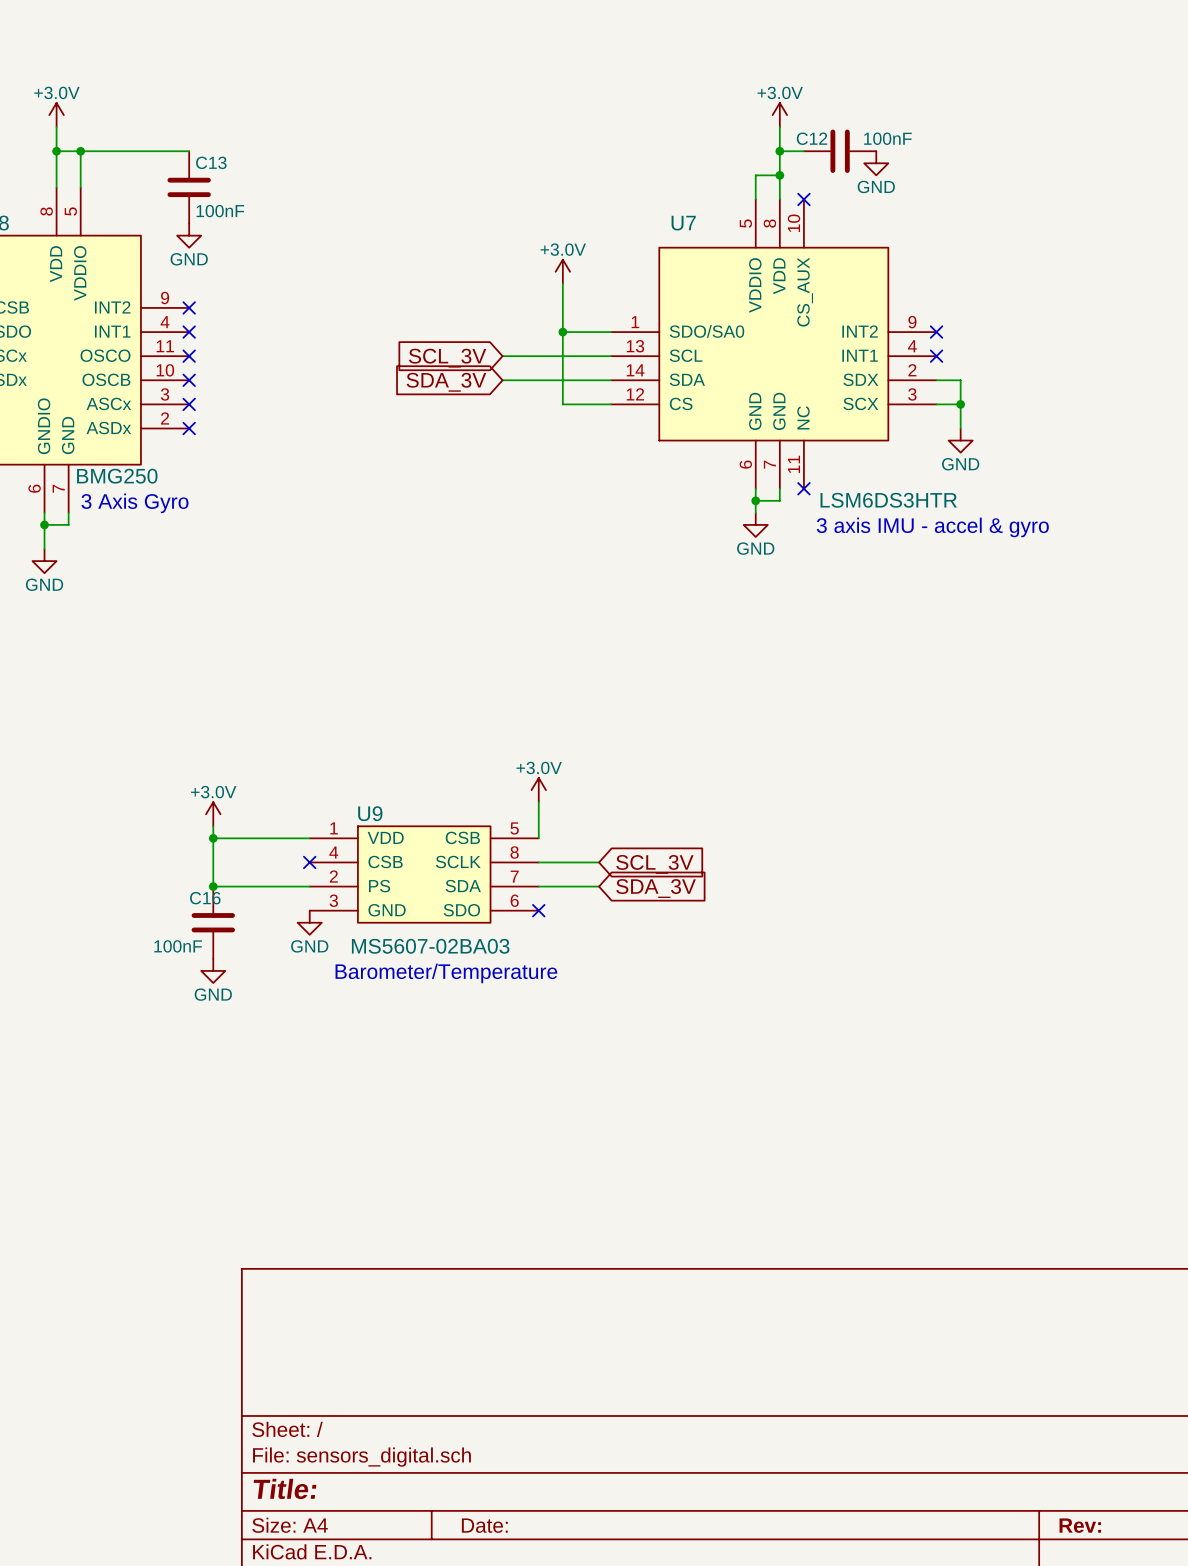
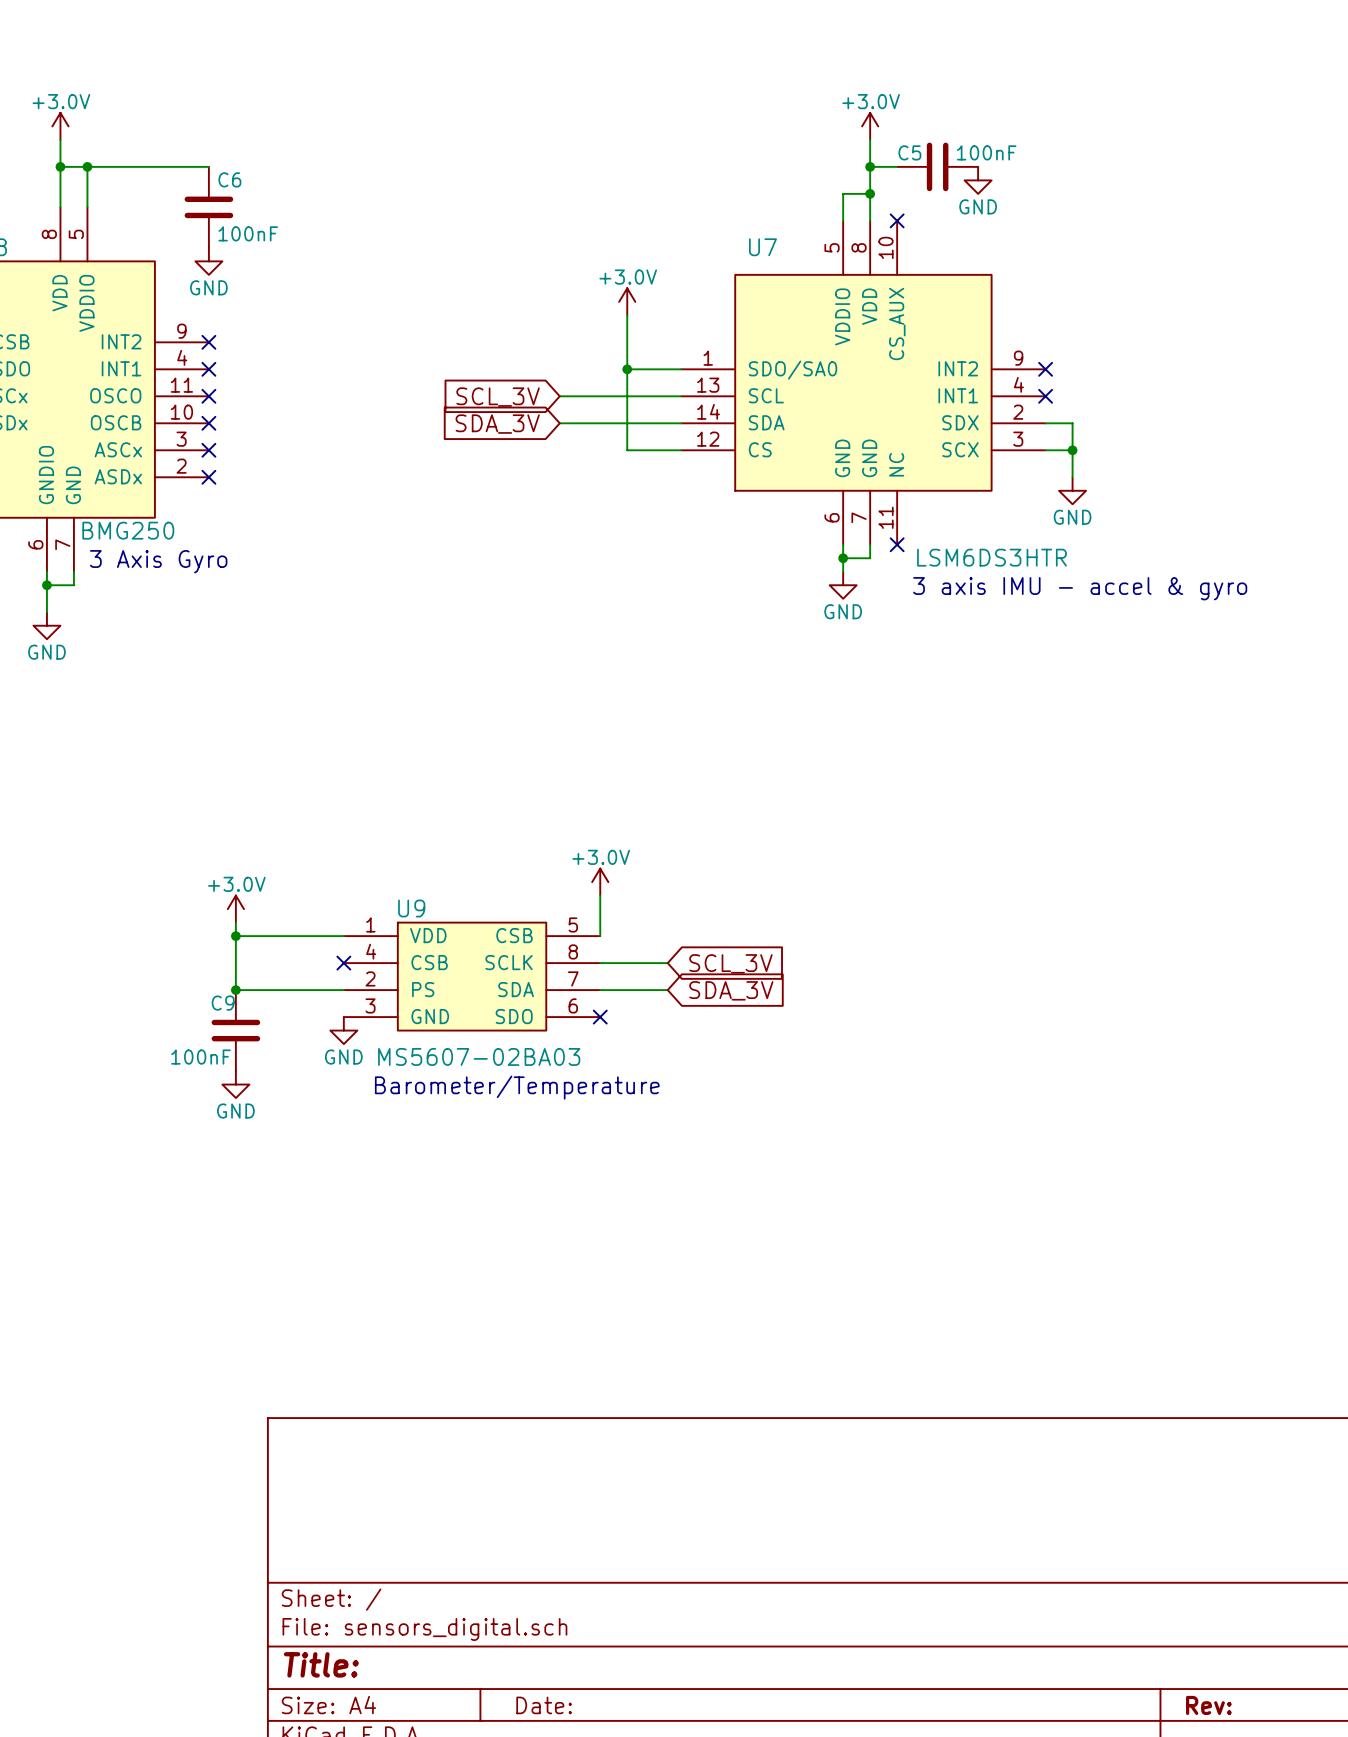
C12 name: C12 (811, 138) -> C5 (909, 152)
C13 name: C13 (211, 162) -> C6 (229, 179)
C16 name: C16 (205, 898) -> C9 (223, 1003)

